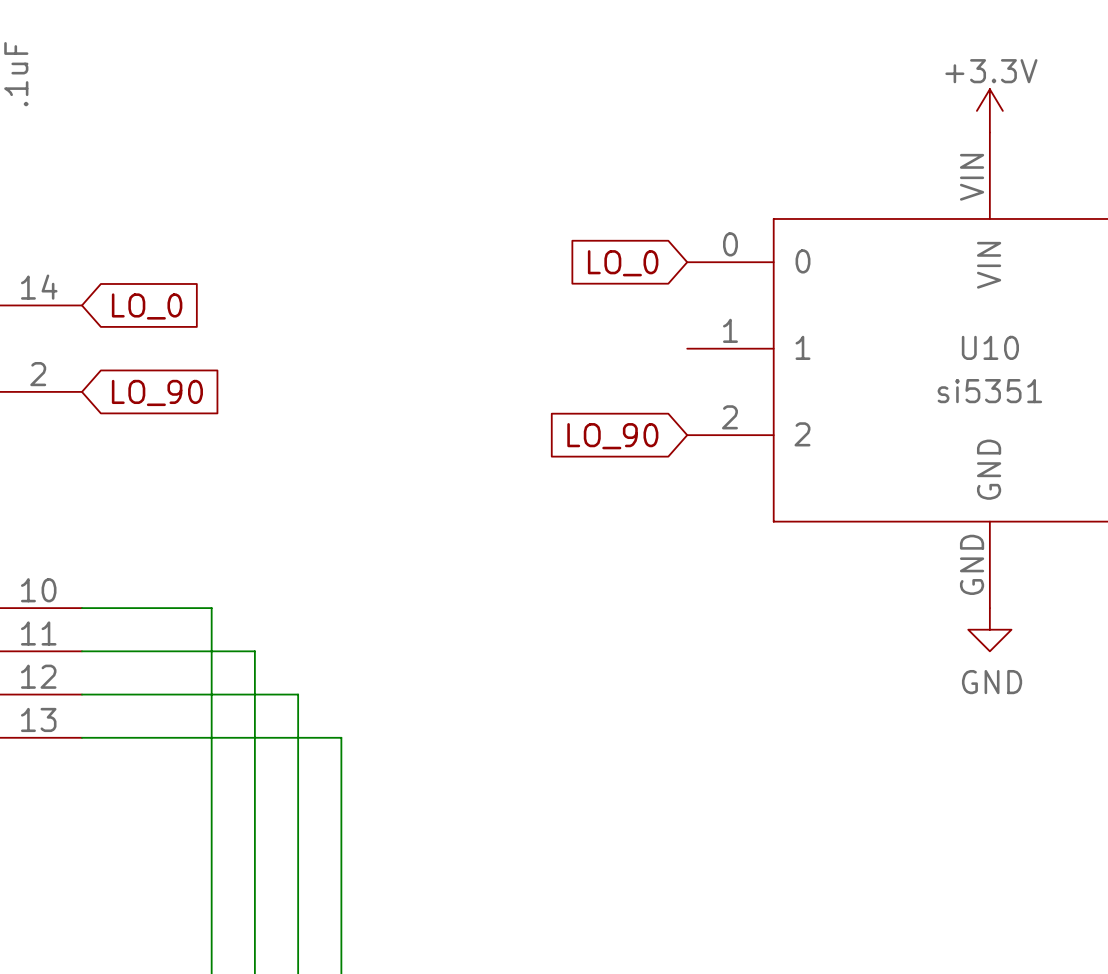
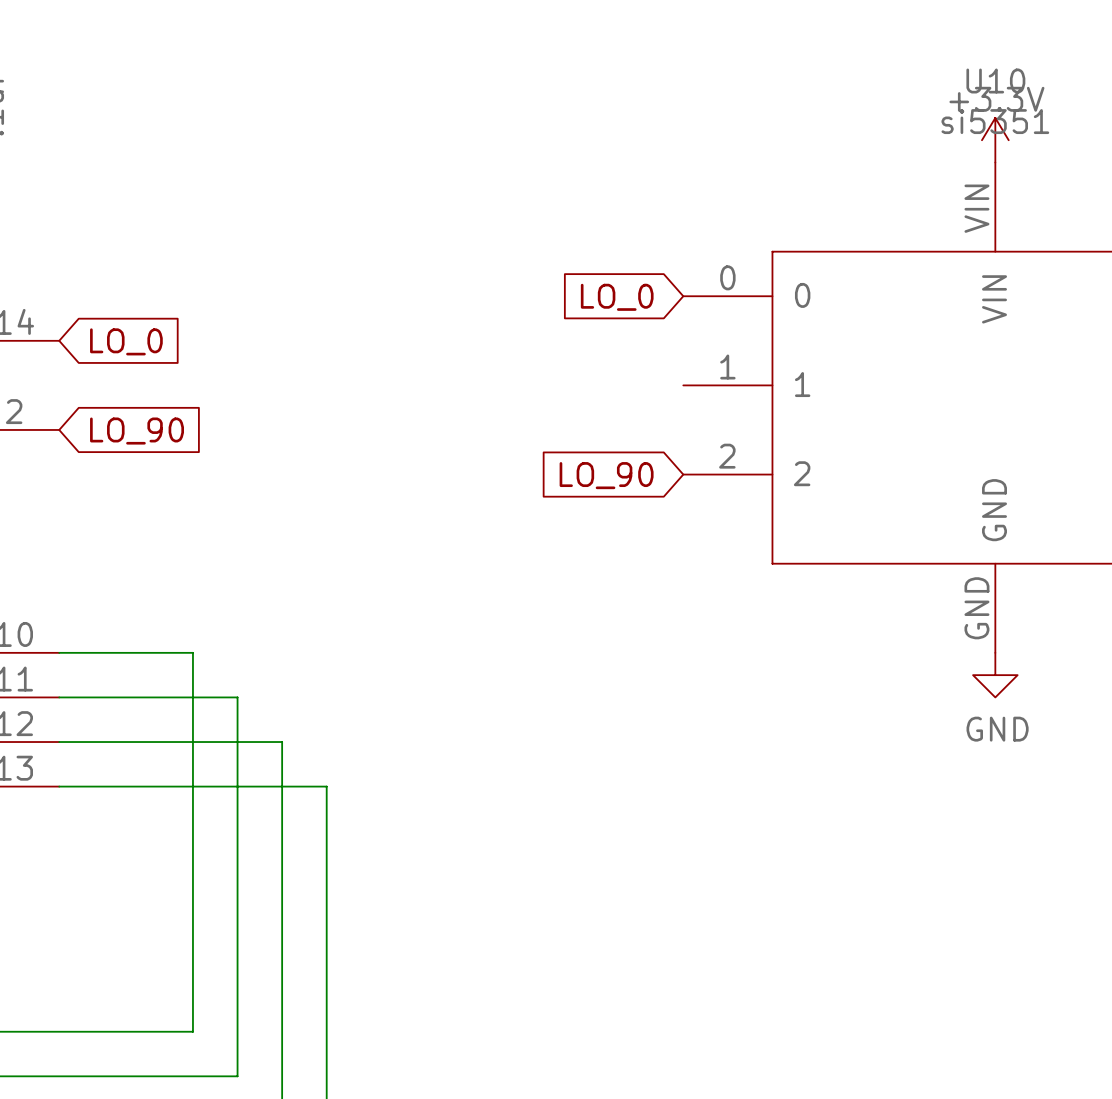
U10 name position: U10 (990, 347) -> U10 (995, 81)
U10 value position: si5351 (989, 391) -> si5351 (995, 121)

